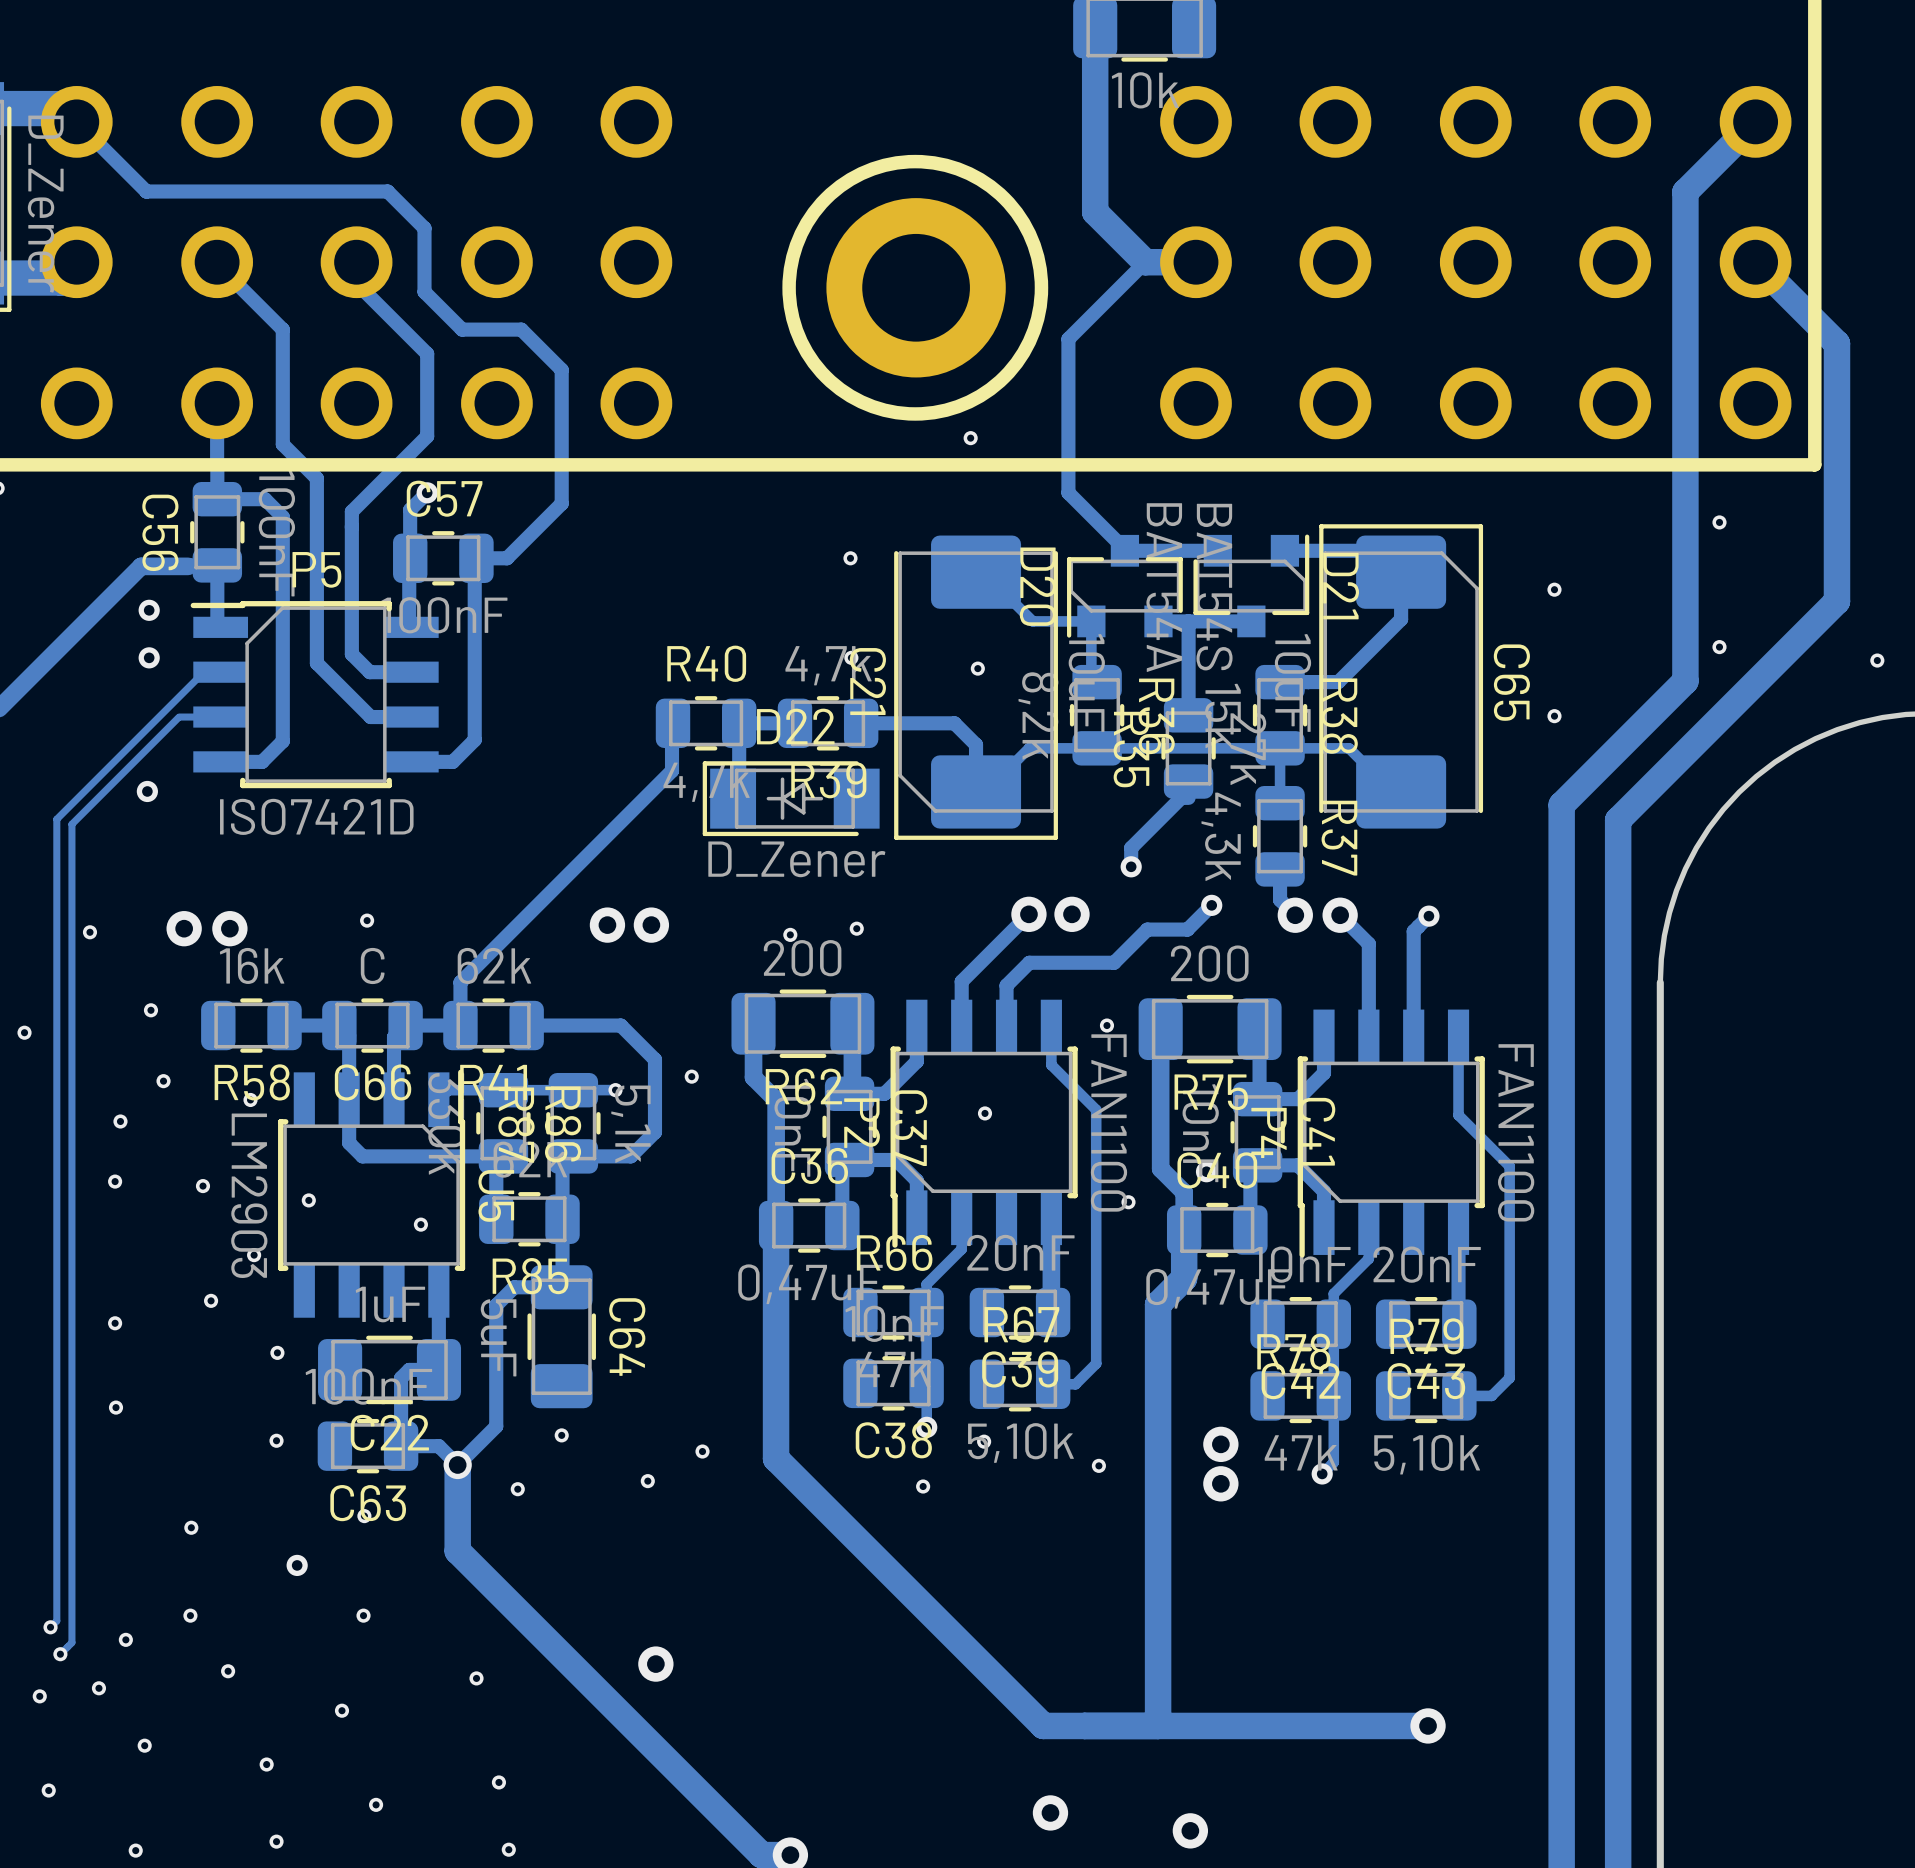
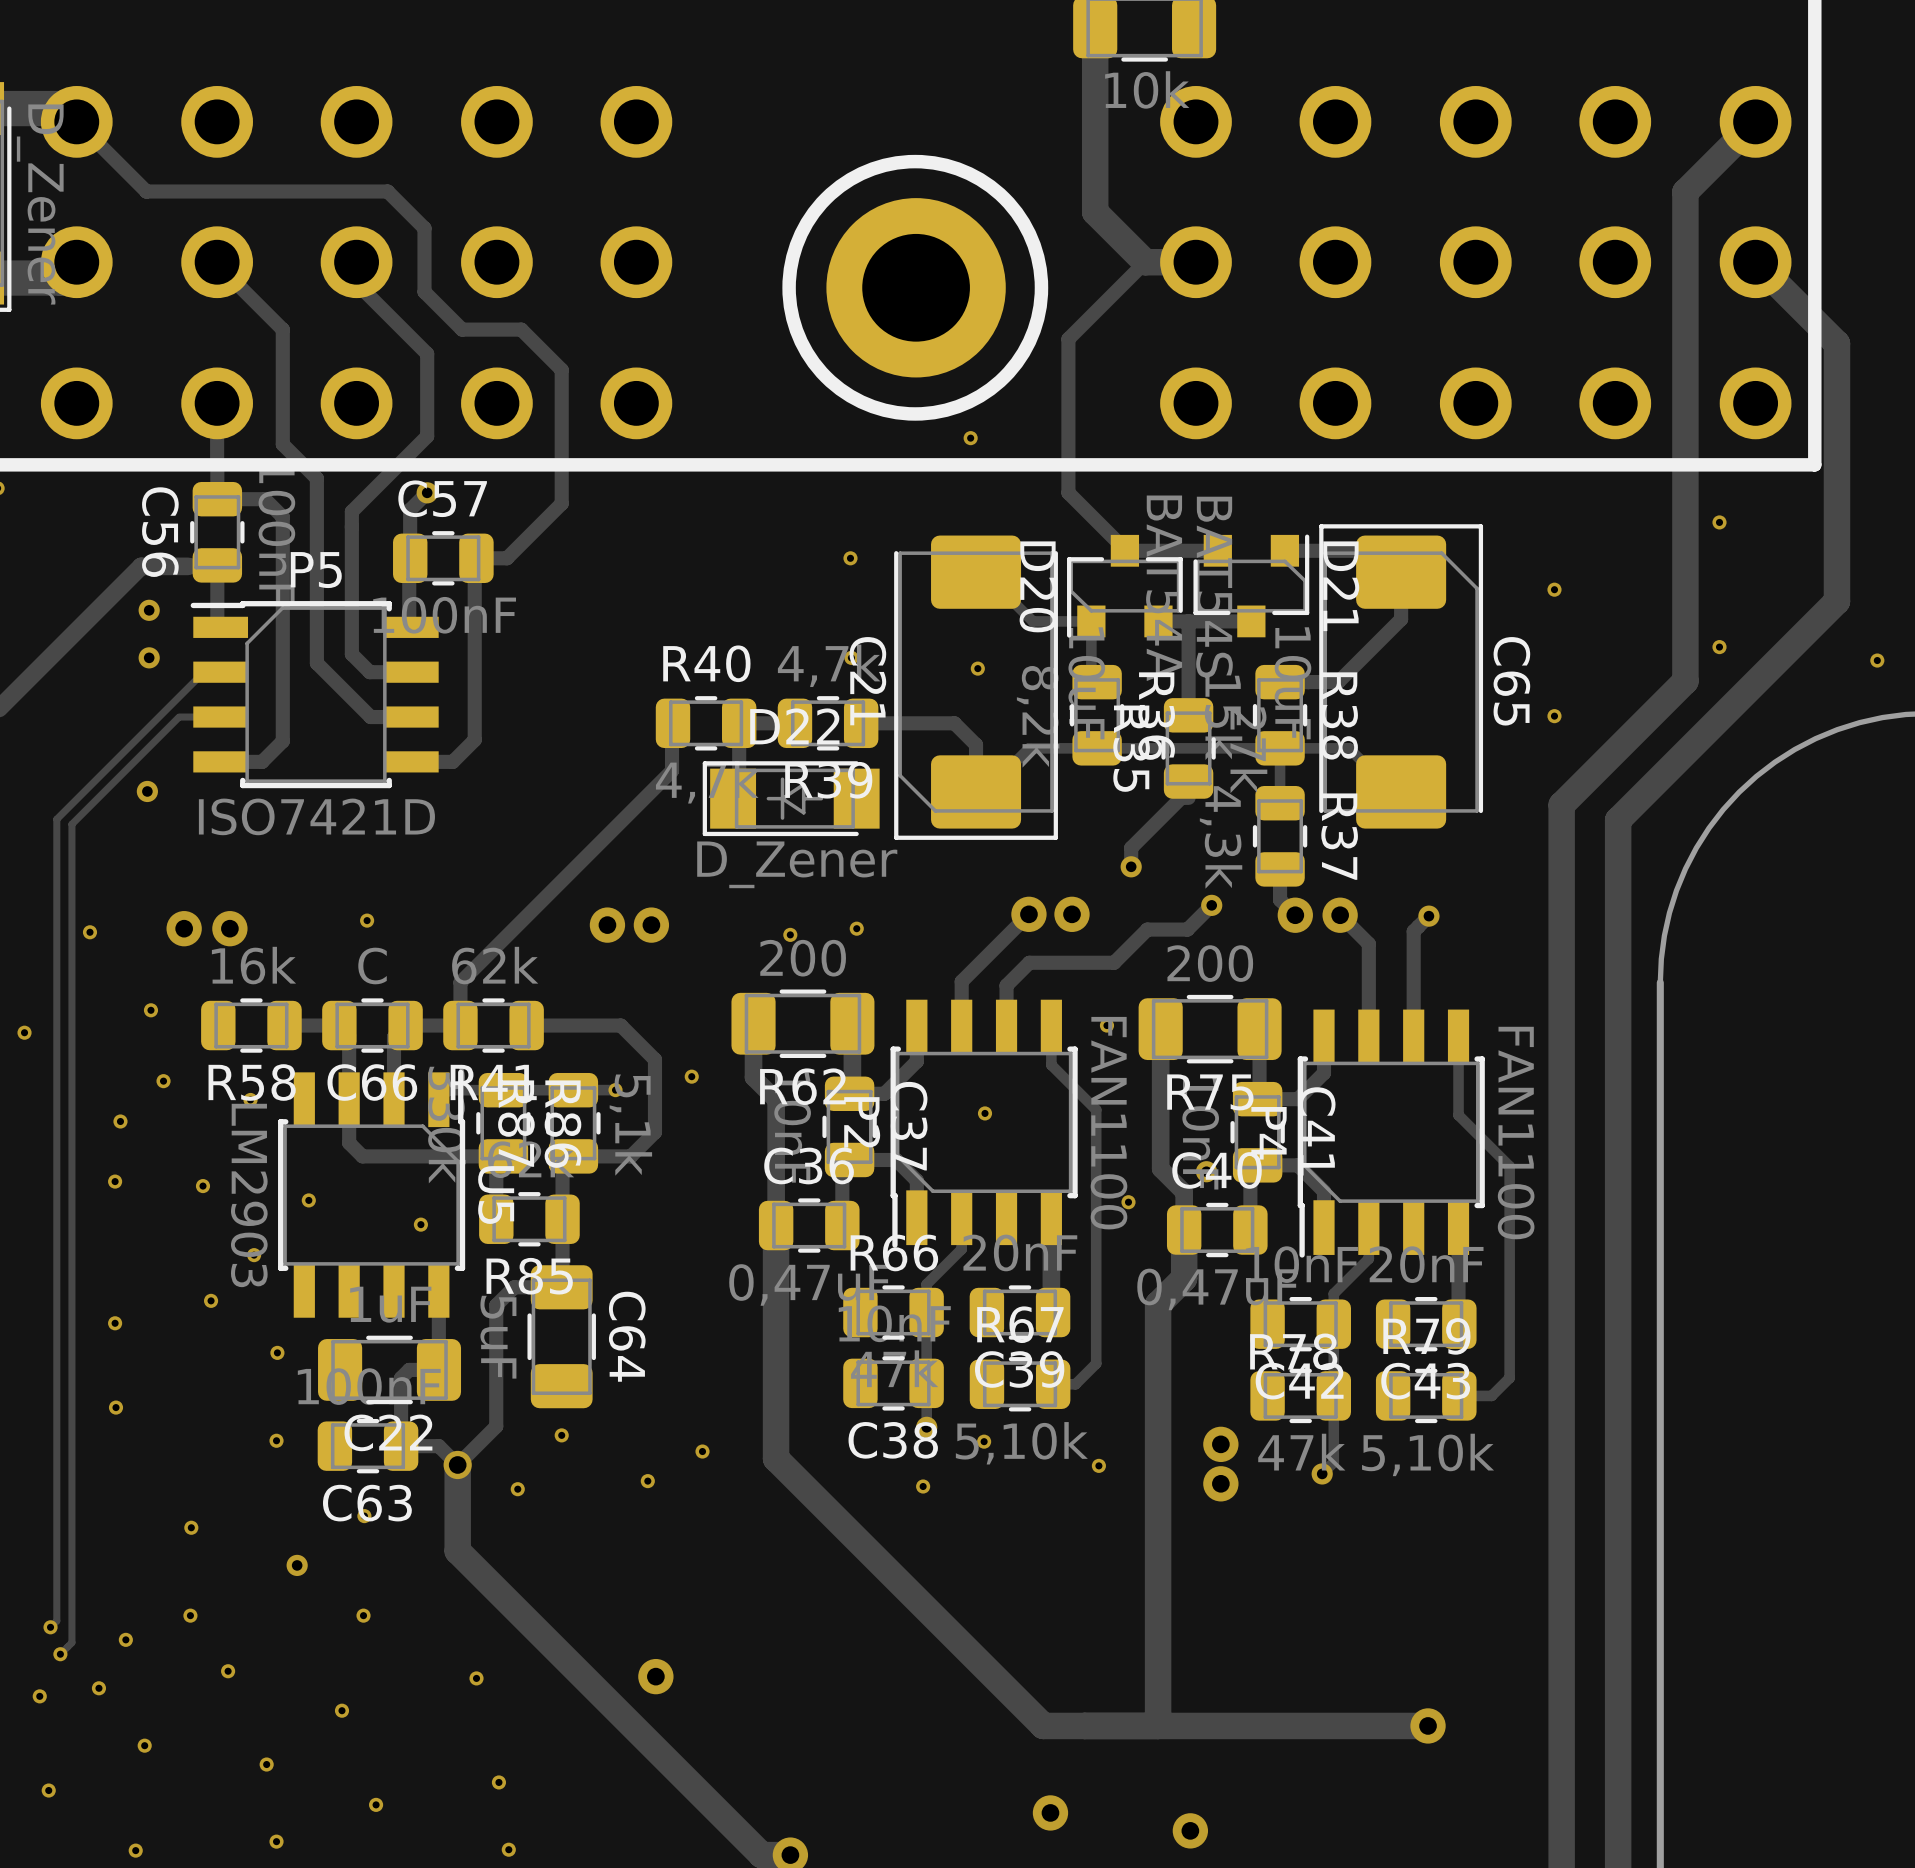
via position: (655, 1664) -> (655, 1676)

